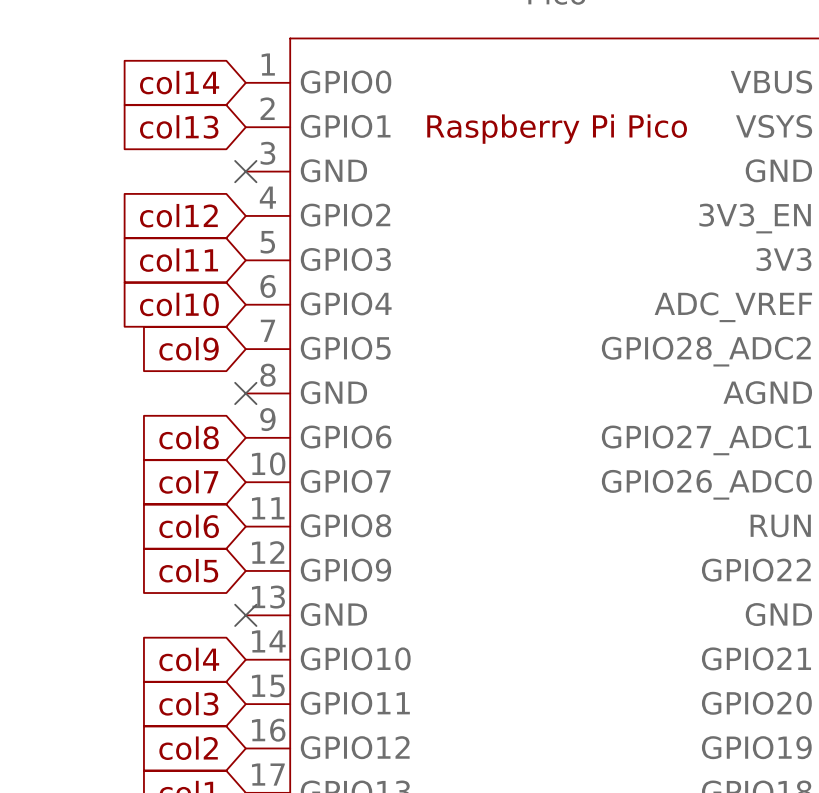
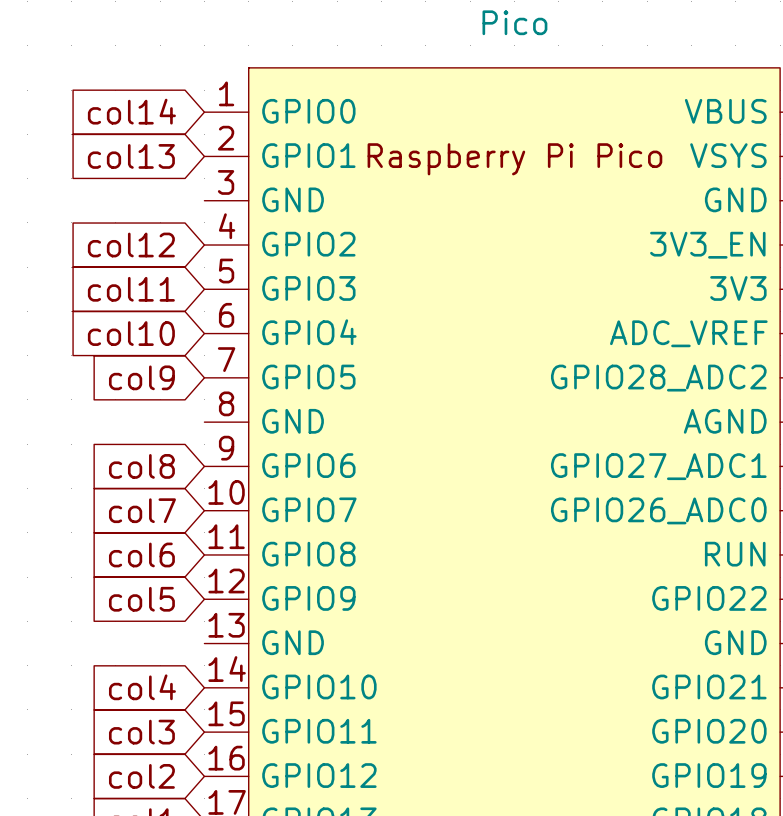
no-connect mark: (245, 171) -> none
no-connect mark: (245, 393) -> none
no-connect mark: (245, 615) -> none

